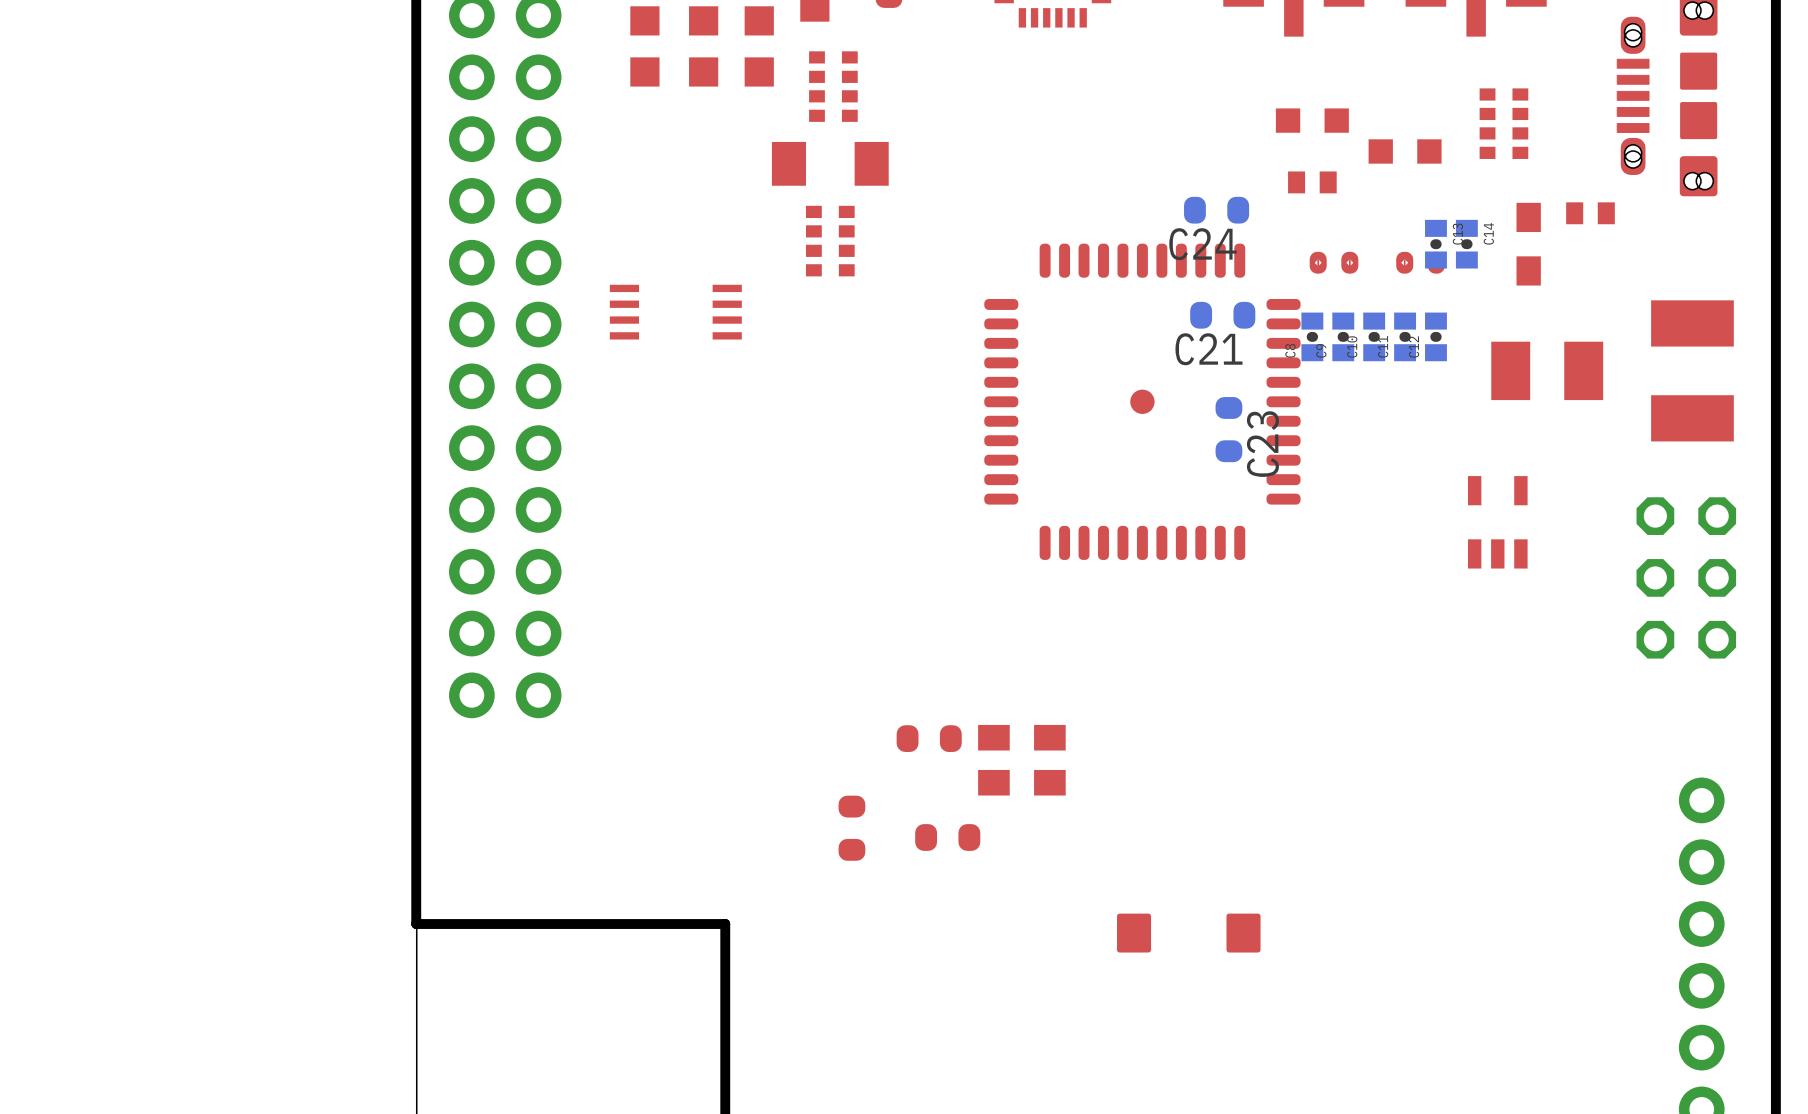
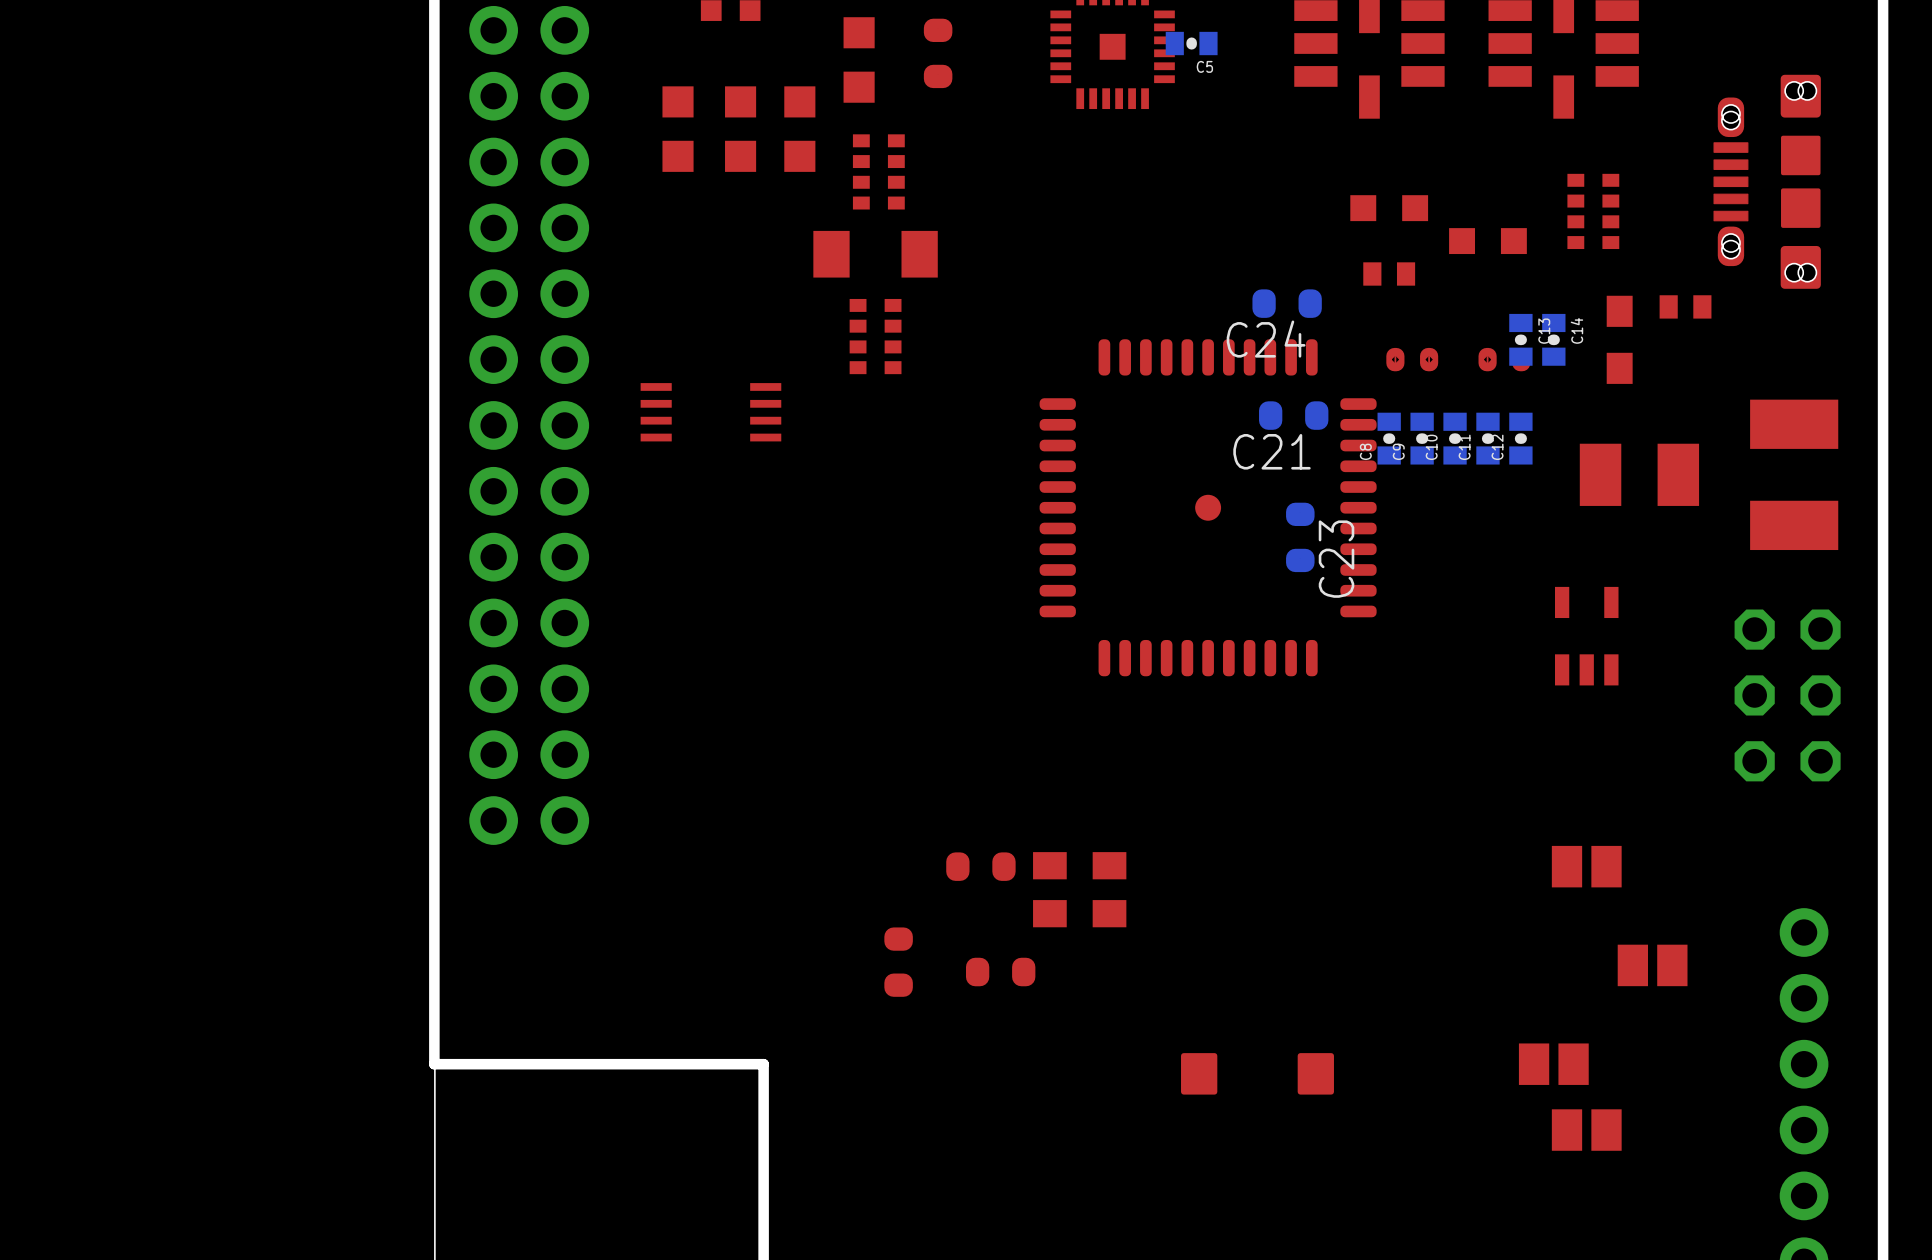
part: none -> (1586, 866)
part: none -> (1652, 965)
part: none -> (1553, 1064)
part: none -> (1586, 1130)

